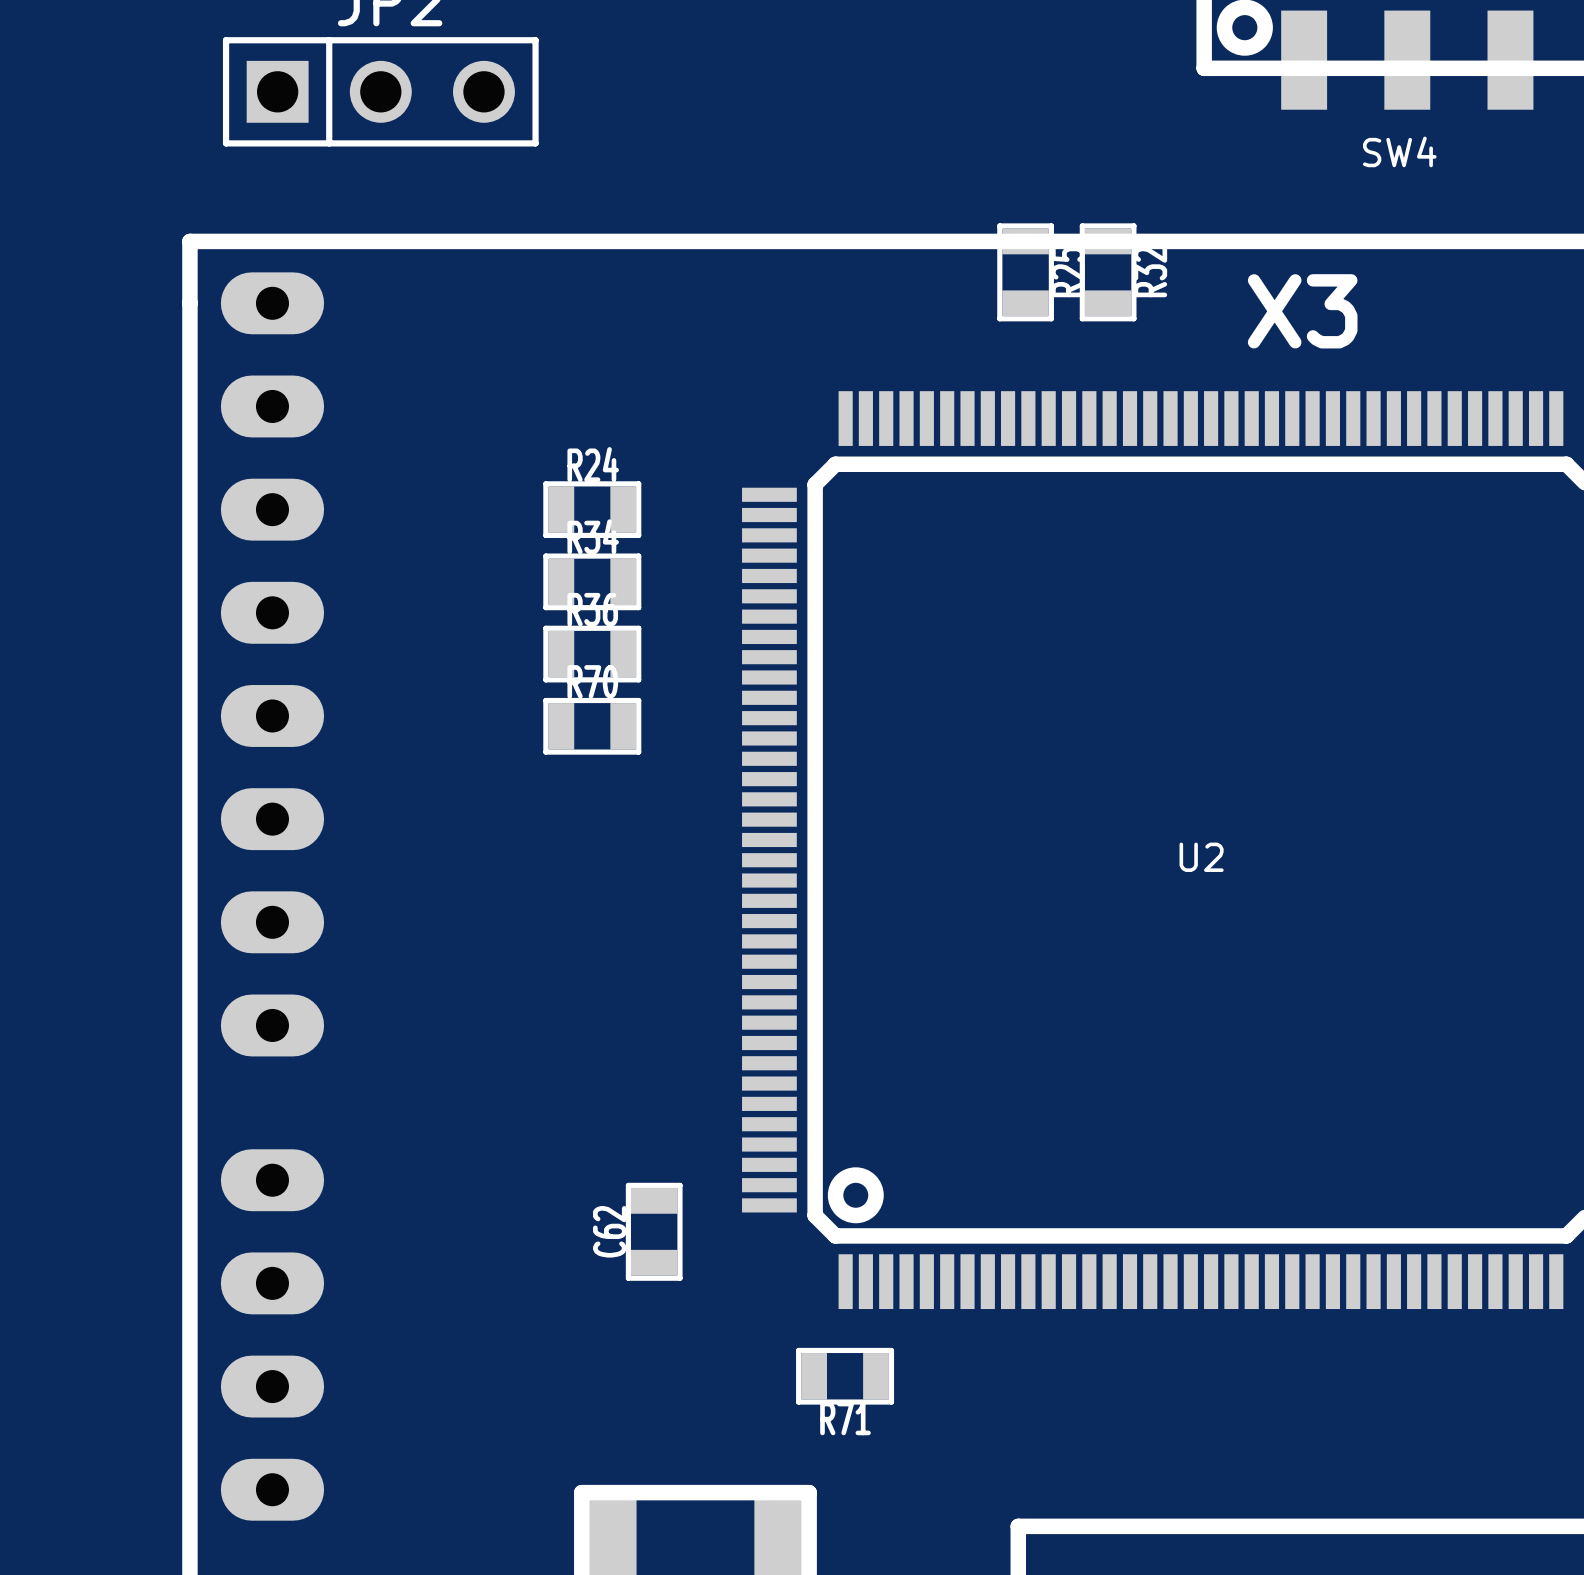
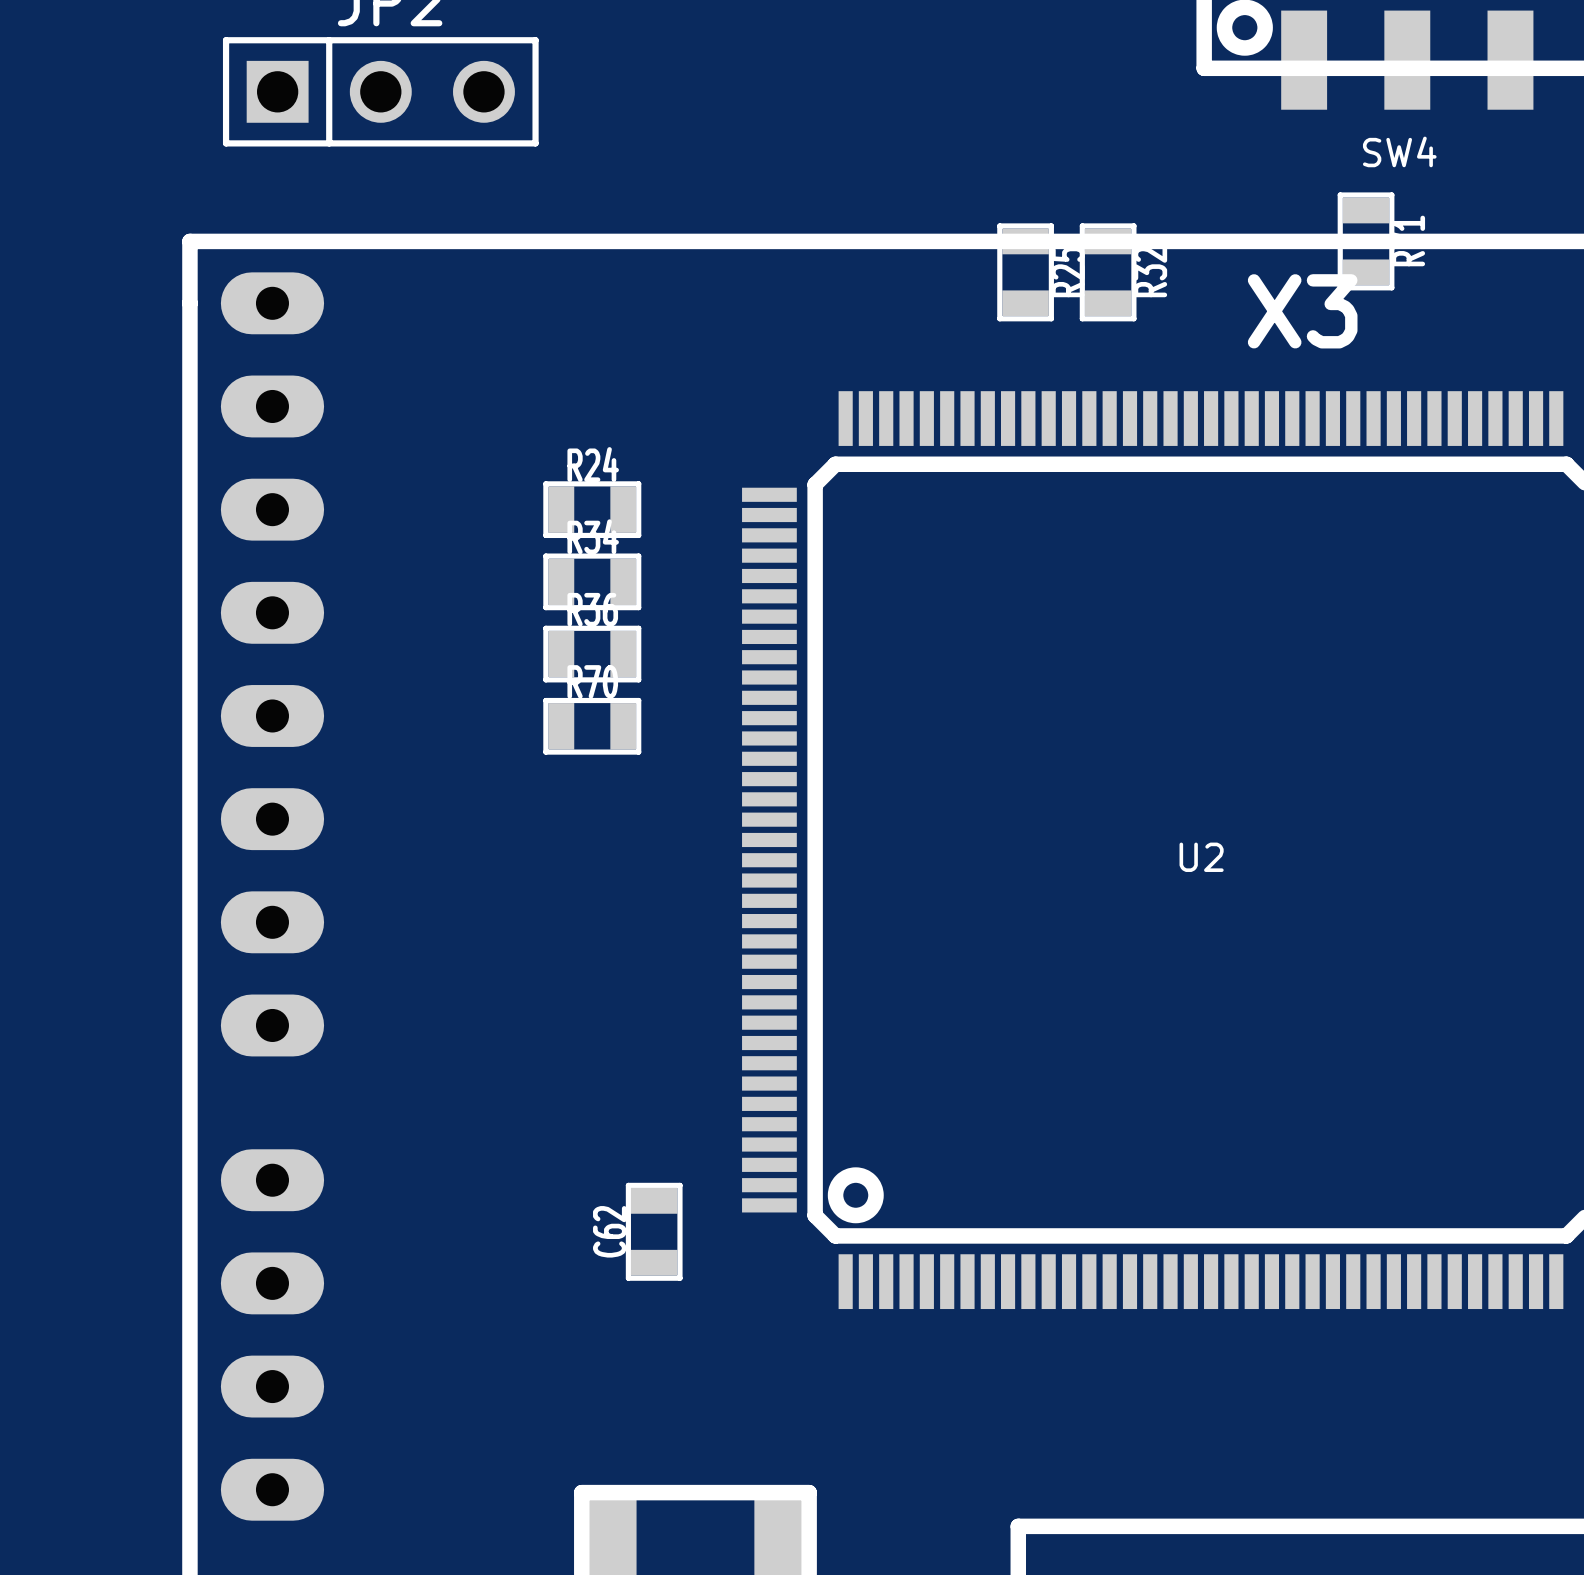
R71 rotation: 0° (845, 1376) -> 90° clockwise (1366, 241)
R71 position: (845, 1376) -> (1366, 241)

